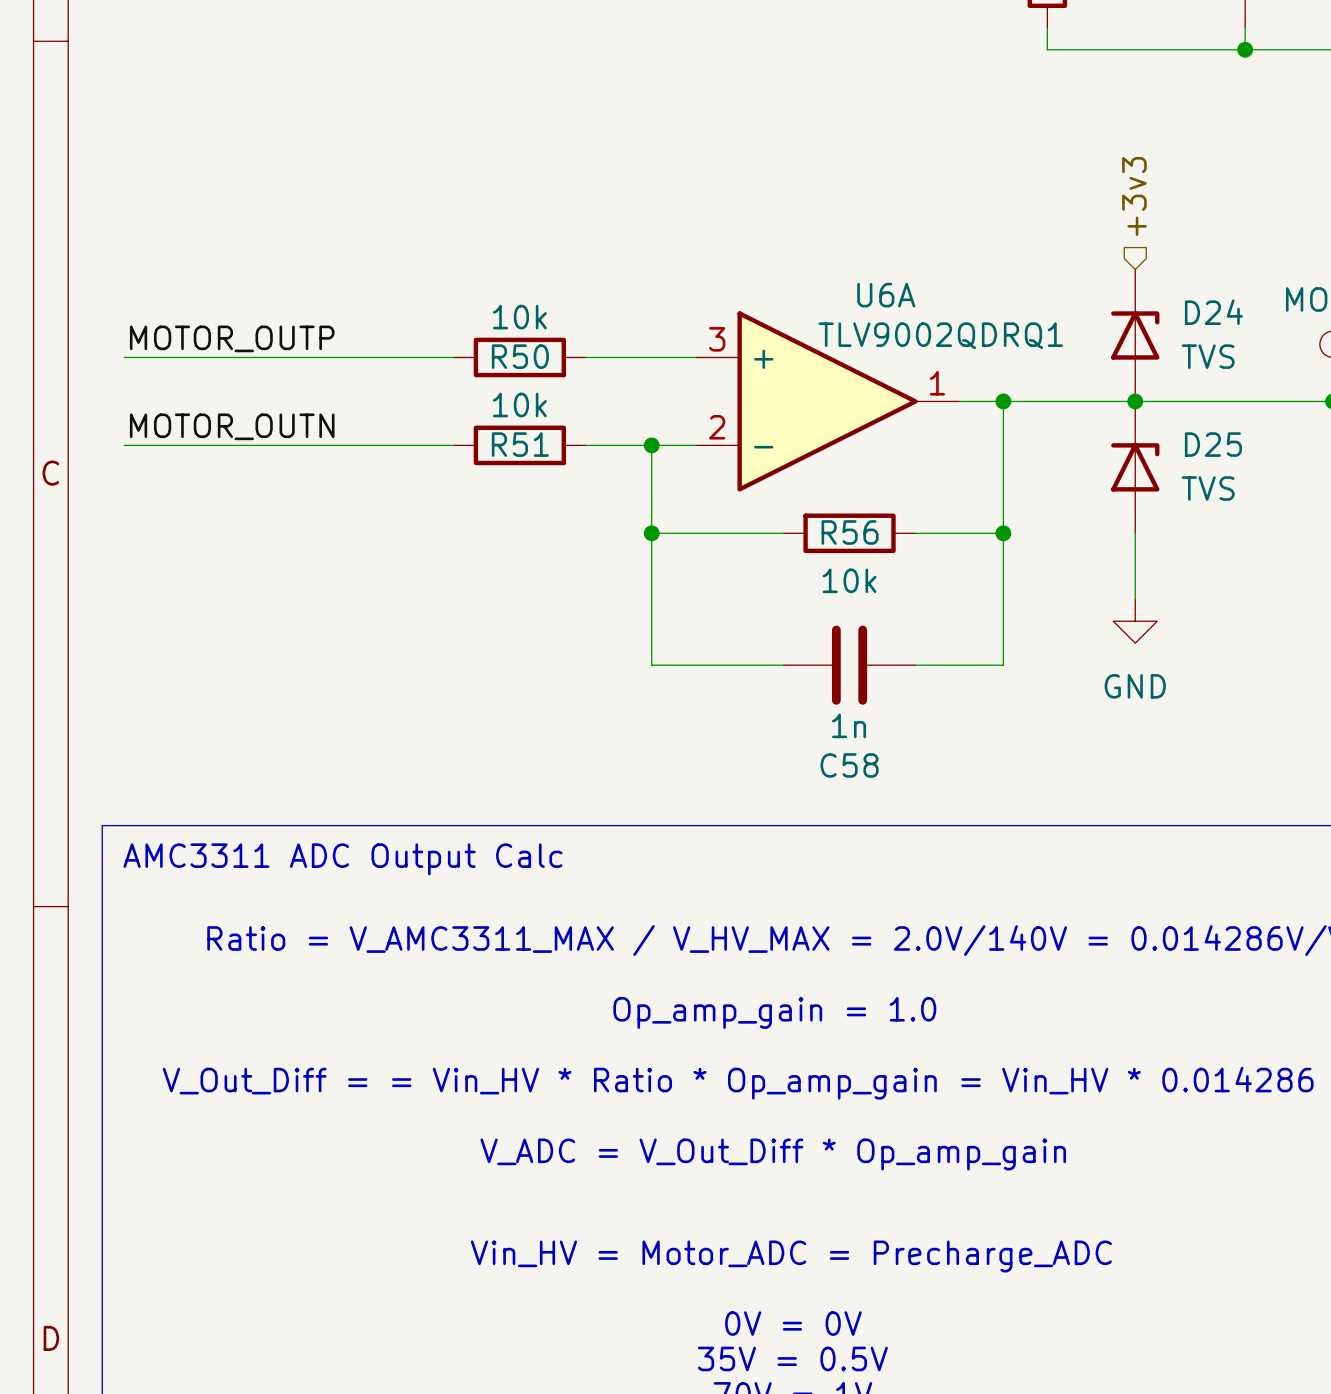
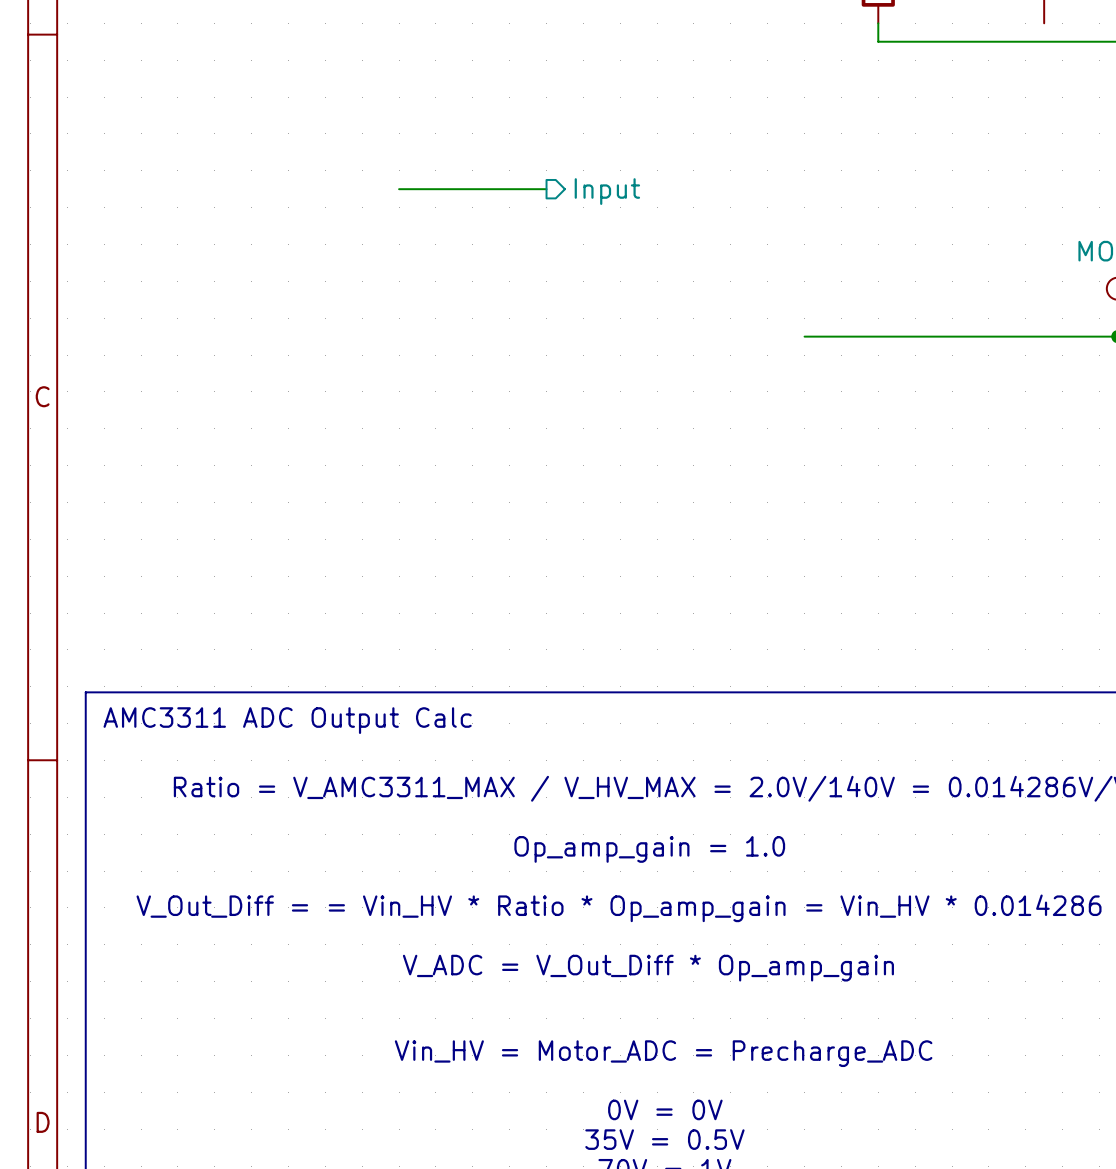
wire: (1245, 27) (1245, 49) -> none
junction: (1245, 49) -> none
hierarchical label: +3v3 (1134, 196) -> none
wire: none -> (399, 189) (546, 189)
sheet pin: none -> Input (607, 191)
D24: TVS (1135, 335) -> none
label: MOTOR_OUTP (232, 338) -> none
wire: (124, 357) (453, 357) -> none
R50: 10k (519, 357) -> none
wire: (585, 357) (695, 357) -> none
U6A: TLV9002QDRQ1 (827, 401) -> none
wire: (1003, 401) (1003, 665) (915, 665) -> none
junction: (1003, 401) -> none
junction: (1135, 401) -> none
label: MOTOR_OUTN (232, 426) -> none
wire: (124, 445) (453, 445) -> none
R51: 10k (519, 445) -> none
wire: (585, 445) (695, 445) -> none
wire: (651, 445) (651, 665) (783, 665) -> none
junction: (651, 445) -> none
D25: TVS (1135, 467) -> none
wire: (651, 533) (783, 533) -> none
junction: (651, 533) -> none
R56: 10k (849, 533) -> none
wire: (915, 533) (1003, 533) -> none
junction: (1003, 533) -> none
wire: (1135, 533) (1135, 599) -> none
power symbol: GND (1135, 621) -> none
C58: 1n (849, 665) -> none

